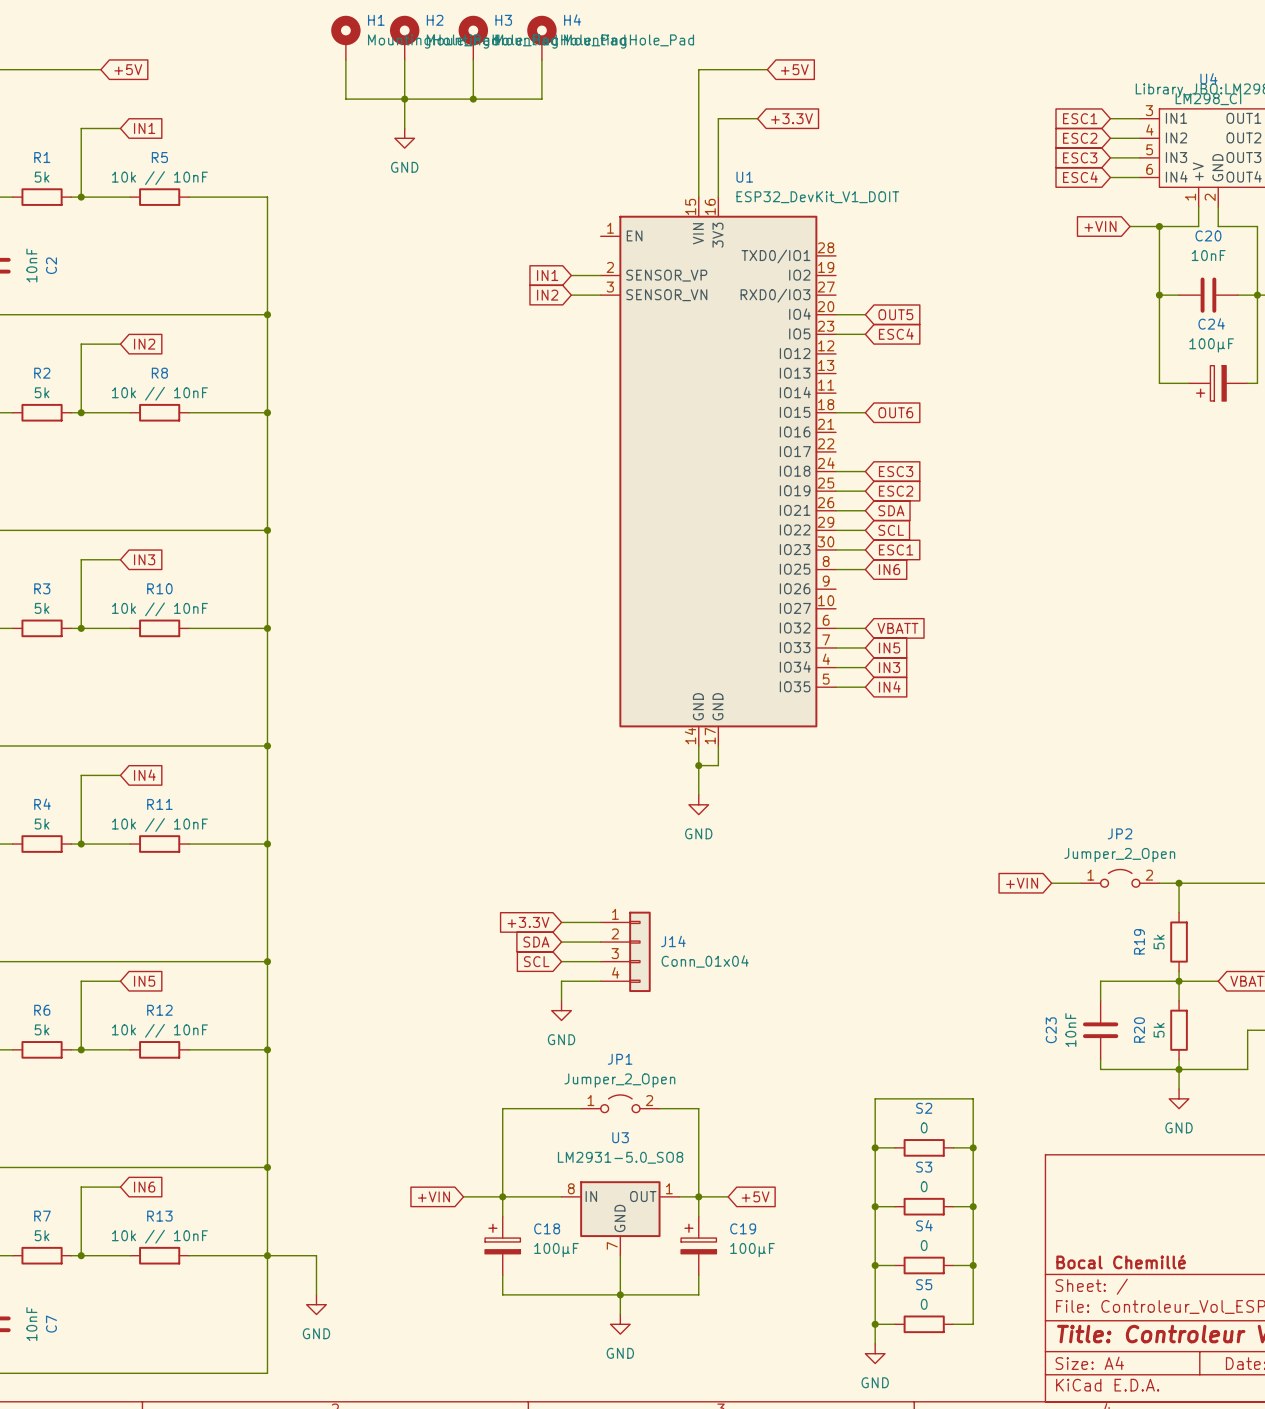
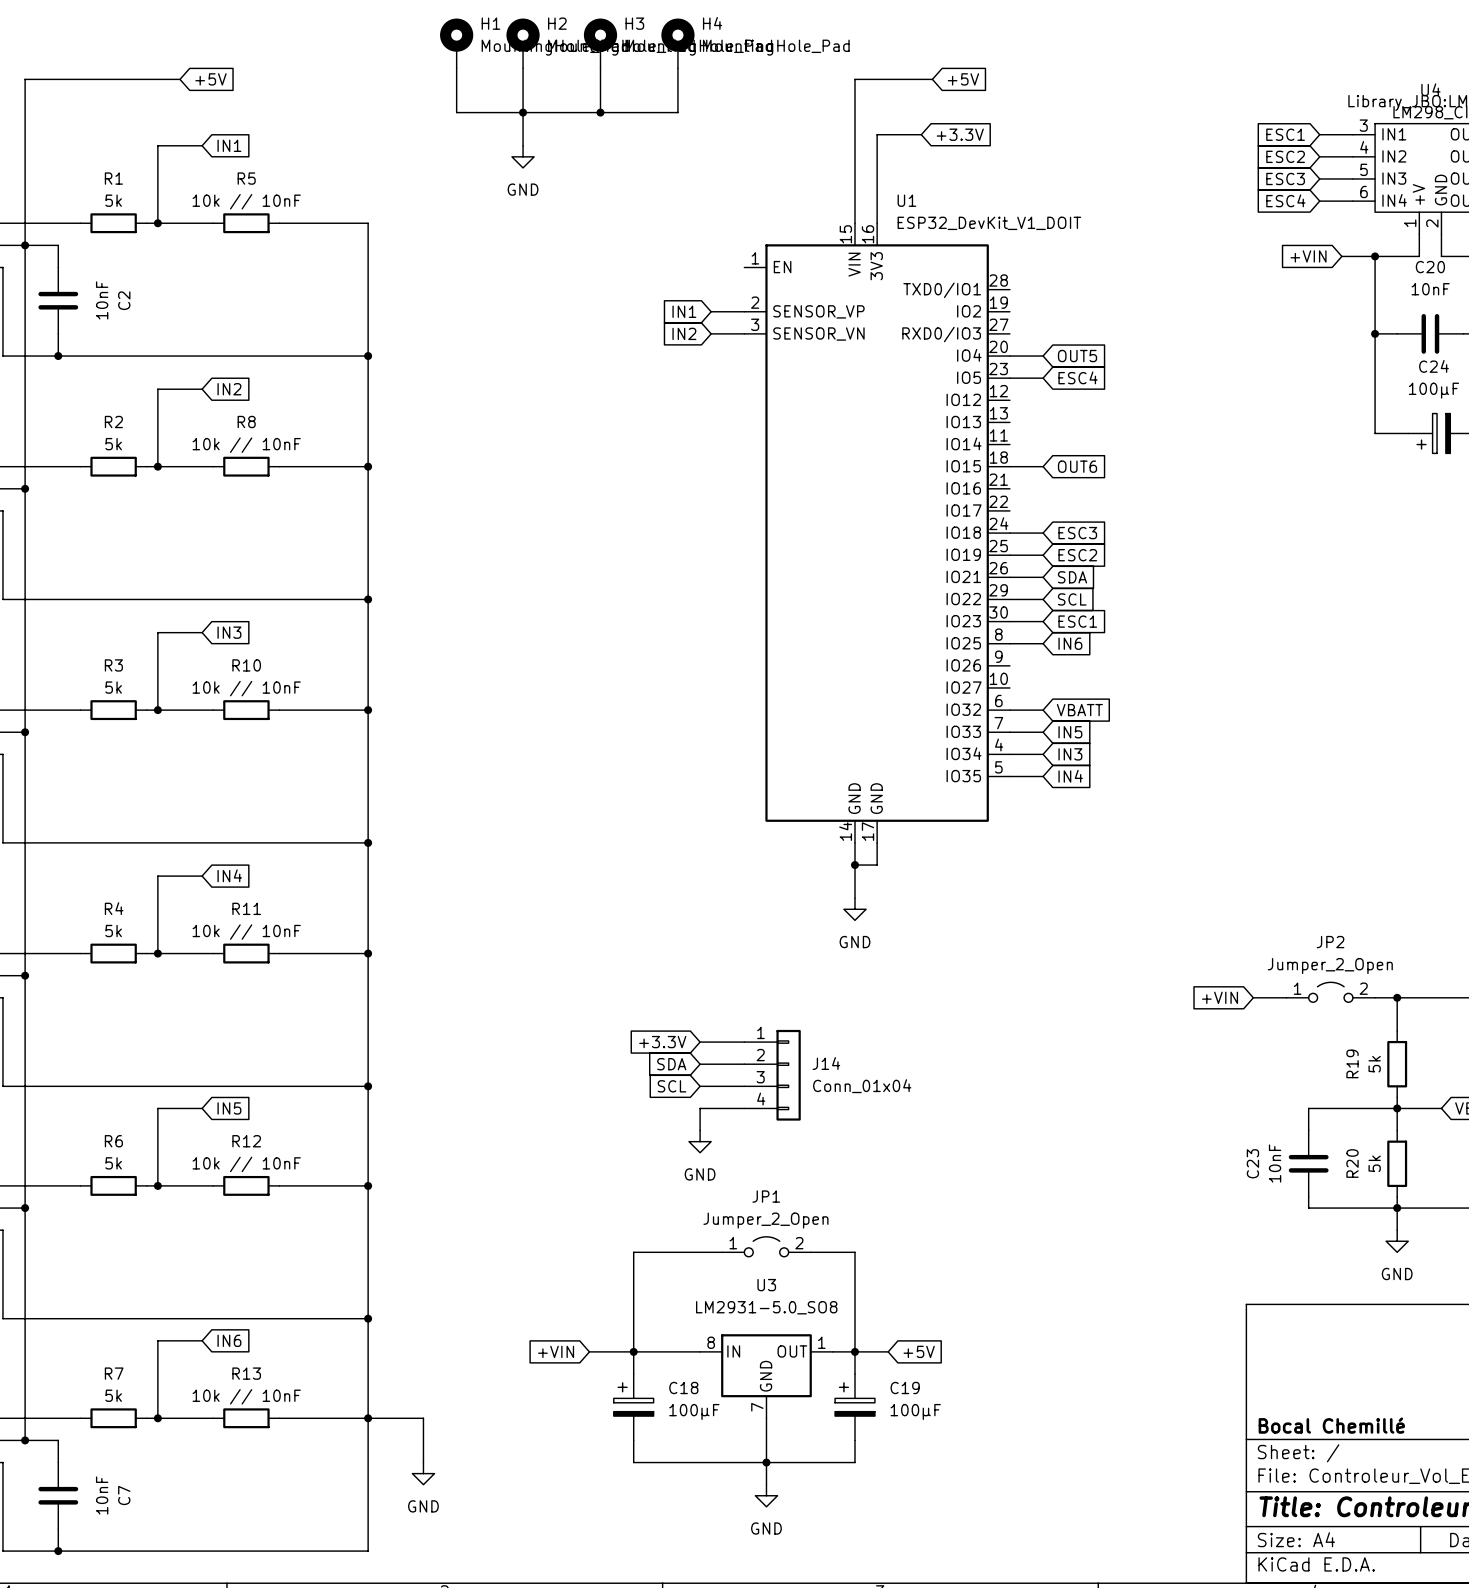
wire: (875, 1147) (894, 1147) -> none
junction: (875, 1147) -> none
S2: 0 (924, 1147) -> none
wire: (953, 1147) (973, 1147) -> none
junction: (973, 1147) -> none
wire: (875, 1206) (894, 1206) -> none
junction: (875, 1206) -> none
S3: 0 (924, 1206) -> none
wire: (953, 1206) (973, 1206) -> none
junction: (973, 1206) -> none
wire: (875, 1265) (894, 1265) -> none
junction: (875, 1265) -> none
S4: 0 (924, 1265) -> none
wire: (953, 1265) (973, 1265) -> none
junction: (973, 1265) -> none
wire: (875, 1324) (894, 1324) -> none
junction: (875, 1324) -> none
S5: 0 (924, 1324) -> none
wire: (953, 1324) (973, 1324) (973, 1098) (875, 1098) (875, 1343) -> none
power symbol: GND (875, 1353) -> none

